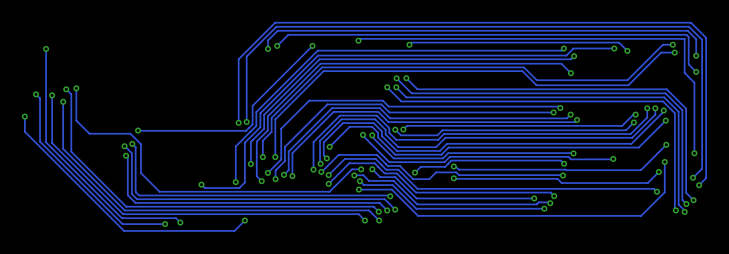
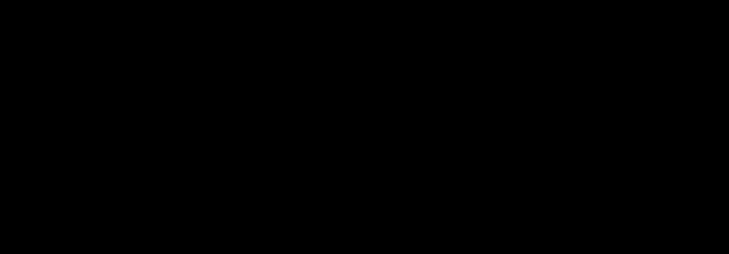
track: (358, 40) (360, 38) (684, 38) (684, 72) (694, 82) (694, 153) -> none
via: (358, 40) -> none
track: (409, 44) (411, 42) (619, 42) (627, 50) -> none
via: (409, 44) -> none
track: (672, 44) (662, 44) (627, 80) (536, 80) (524, 67) (322, 67) (271, 117) (271, 132) (262, 140) (262, 157) -> none
via: (672, 44) -> none
track: (277, 45) (288, 34) (686, 34) (688, 37) (688, 64) (696, 71) -> none
via: (277, 45) -> none
track: (312, 45) (252, 105) (252, 124) (249, 127) -> none
via: (312, 45) -> none
track: (46, 48) (46, 142) (121, 218) (175, 218) (180, 222) -> none
via: (46, 48) -> none
track: (268, 48) (268, 40) (277, 30) (687, 30) (696, 39) (696, 55) -> none
via: (268, 48) -> none
track: (563, 48) (561, 50) (317, 50) (256, 112) (256, 125) (250, 131) -> none
via: (563, 48) -> none
track: (614, 48) (573, 48) (566, 55) (318, 55) (260, 113) (260, 127) (244, 142) (244, 182) (239, 188) (204, 188) (201, 184) -> none
via: (614, 48) -> none
via: (627, 50) -> none
track: (674, 52) (661, 52) (628, 85) (536, 85) (522, 71) (323, 71) (275, 119) (275, 157) -> none
via: (674, 52) -> none
via: (696, 55) -> none
track: (574, 56) (571, 59) (319, 59) (264, 114) (264, 128) (250, 141) (250, 163) -> none
via: (574, 56) -> none
via: (696, 71) -> none
track: (570, 73) (561, 63) (320, 63) (267, 116) (267, 130) (256, 141) (256, 176) (261, 181) -> none
via: (570, 73) -> none
track: (396, 78) (411, 93) (665, 93) (682, 110) (682, 199) (686, 204) -> none
via: (396, 78) -> none
track: (406, 78) (417, 89) (666, 89) (686, 108) (686, 192) (693, 200) -> none
via: (406, 78) -> none
track: (387, 87) (401, 101) (663, 101) (674, 113) (675, 210) -> none
via: (387, 87) -> none
track: (396, 87) (406, 97) (664, 97) (678, 111) (678, 204) (684, 211) -> none
via: (396, 87) -> none
track: (76, 88) (76, 120) (89, 133) (130, 133) (140, 144) (140, 173) (159, 191) (329, 191) (352, 169) (361, 169) -> none
via: (76, 88) -> none
track: (66, 89) (71, 94) (71, 151) (126, 206) (373, 206) (378, 211) -> none
via: (66, 89) -> none
track: (35, 94) (40, 98) (40, 141) (122, 224) (165, 224) -> none
via: (35, 94) -> none
track: (52, 95) (52, 143) (123, 214) (358, 214) (365, 220) -> none
via: (52, 95) -> none
track: (63, 101) (63, 148) (124, 210) (369, 210) (379, 220) -> none
via: (63, 101) -> none
track: (560, 108) (388, 106) (382, 100) (309, 100) (281, 128) (281, 159) (267, 172) -> none
via: (560, 108) -> none
track: (647, 108) (647, 117) (630, 134) (443, 134) (438, 139) (396, 139) (389, 132) (389, 128) (376, 115) (339, 115) (313, 142) (313, 169) -> none
via: (647, 108) -> none
track: (655, 108) (655, 114) (632, 137) (445, 137) (436, 147) (398, 147) (385, 134) (385, 129) (375, 119) (341, 119) (320, 140) (320, 163) -> none
via: (655, 108) -> none
track: (663, 110) (631, 143) (447, 143) (439, 150) (396, 150) (381, 135) (381, 131) (373, 123) (343, 123) (323, 142) (323, 155) (326, 158) -> none
via: (663, 110) -> none
track: (553, 112) (389, 112) (381, 104) (327, 104) (284, 146) (284, 161) (275, 170) (275, 179) -> none
via: (553, 112) -> none
track: (570, 114) (566, 118) (390, 118) (379, 108) (332, 108) (288, 151) (288, 170) (284, 174) -> none
via: (570, 114) -> none
track: (635, 114) (622, 125) (406, 125) (403, 129) -> none
via: (635, 114) -> none
track: (24, 116) (24, 131) (124, 230) (234, 230) (244, 220) -> none
via: (24, 116) -> none
track: (577, 119) (574, 122) (388, 122) (378, 111) (333, 111) (292, 153) (292, 176) -> none
via: (577, 119) -> none
track: (665, 120) (638, 147) (448, 147) (441, 154) (395, 154) (378, 137) (378, 132) (372, 126) (349, 126) (329, 146) -> none
via: (665, 120) -> none
track: (246, 121) (246, 56) (276, 26) (688, 26) (702, 39) (702, 168) (693, 177) -> none
via: (246, 121) -> none
track: (238, 122) (238, 59) (275, 22) (691, 22) (706, 37) (706, 178) (699, 185) -> none
via: (238, 122) -> none
track: (633, 122) (626, 130) (442, 130) (437, 135) (400, 135) (395, 129) -> none
via: (633, 122) -> none
track: (248, 127) (246, 130) (138, 130) -> none
via: (395, 129) -> none
via: (403, 129) -> none
via: (138, 130) -> none
track: (250, 131) (235, 146) (235, 182) -> none
track: (362, 134) (389, 162) (444, 162) (449, 156) (568, 156) (570, 159) (613, 158) -> none
via: (362, 134) -> none
track: (372, 135) (393, 158) (442, 158) (448, 153) (573, 153) -> none
via: (372, 135) -> none
track: (132, 143) (135, 147) (135, 192) (139, 195) (390, 196) -> none
via: (132, 143) -> none
track: (666, 144) (640, 170) (458, 169) (453, 166) -> none
via: (666, 144) -> none
track: (124, 146) (131, 153) (131, 194) (137, 199) (384, 199) (395, 209) -> none
via: (124, 146) -> none
via: (329, 146) -> none
via: (573, 153) -> none
via: (694, 153) -> none
track: (126, 155) (127, 157) (127, 195) (135, 202) (379, 202) (387, 210) -> none
via: (126, 155) -> none
via: (262, 157) -> none
via: (275, 157) -> none
via: (326, 158) -> none
via: (613, 158) -> none
track: (664, 161) (664, 192) (641, 215) (418, 215) (391, 189) (358, 189) -> none
via: (664, 161) -> none
via: (320, 163) -> none
track: (385, 163) (376, 154) (338, 154) (321, 171) -> none
track: (385, 163) (387, 165) (399, 165) (413, 179) (429, 179) (436, 172) (456, 172) (459, 175) (563, 175) -> none
track: (564, 163) (560, 160) (451, 160) (445, 166) (420, 166) (414, 172) -> none
via: (564, 163) -> none
via: (250, 164) -> none
track: (382, 165) (375, 158) (344, 158) (328, 175) -> none
track: (382, 165) (386, 169) (398, 169) (417, 188) (654, 188) (656, 191) -> none
track: (378, 166) (374, 163) (349, 163) (328, 183) -> none
via: (453, 166) -> none
track: (378, 167) (384, 173) (396, 173) (415, 192) (550, 192) (554, 196) -> none
via: (313, 169) -> none
via: (361, 169) -> none
track: (372, 169) (380, 177) (395, 177) (416, 198) (534, 198) -> none
via: (372, 169) -> none
via: (321, 171) -> none
track: (658, 171) (647, 183) (561, 183) (557, 178) (453, 178) -> none
via: (658, 171) -> none
via: (267, 172) -> none
via: (414, 172) -> none
via: (284, 174) -> none
via: (328, 175) -> none
track: (354, 175) (363, 175) (369, 180) (393, 180) (417, 204) (550, 203) -> none
via: (354, 175) -> none
via: (563, 175) -> none
via: (292, 176) -> none
via: (693, 177) -> none
via: (453, 178) -> none
via: (275, 179) -> none
via: (261, 181) -> none
track: (359, 181) (363, 185) (392, 185) (416, 208) (544, 208) -> none
via: (359, 181) -> none
via: (235, 182) -> none
via: (328, 183) -> none
via: (201, 184) -> none
via: (699, 185) -> none
via: (358, 189) -> none
via: (656, 191) -> none
via: (390, 196) -> none
via: (554, 196) -> none
via: (534, 198) -> none
via: (693, 200) -> none
via: (550, 203) -> none
via: (686, 204) -> none
via: (544, 208) -> none
via: (395, 209) -> none
via: (387, 210) -> none
via: (675, 210) -> none
via: (378, 211) -> none
via: (684, 211) -> none
via: (244, 220) -> none
via: (365, 220) -> none
via: (379, 220) -> none
via: (180, 222) -> none
via: (165, 224) -> none

